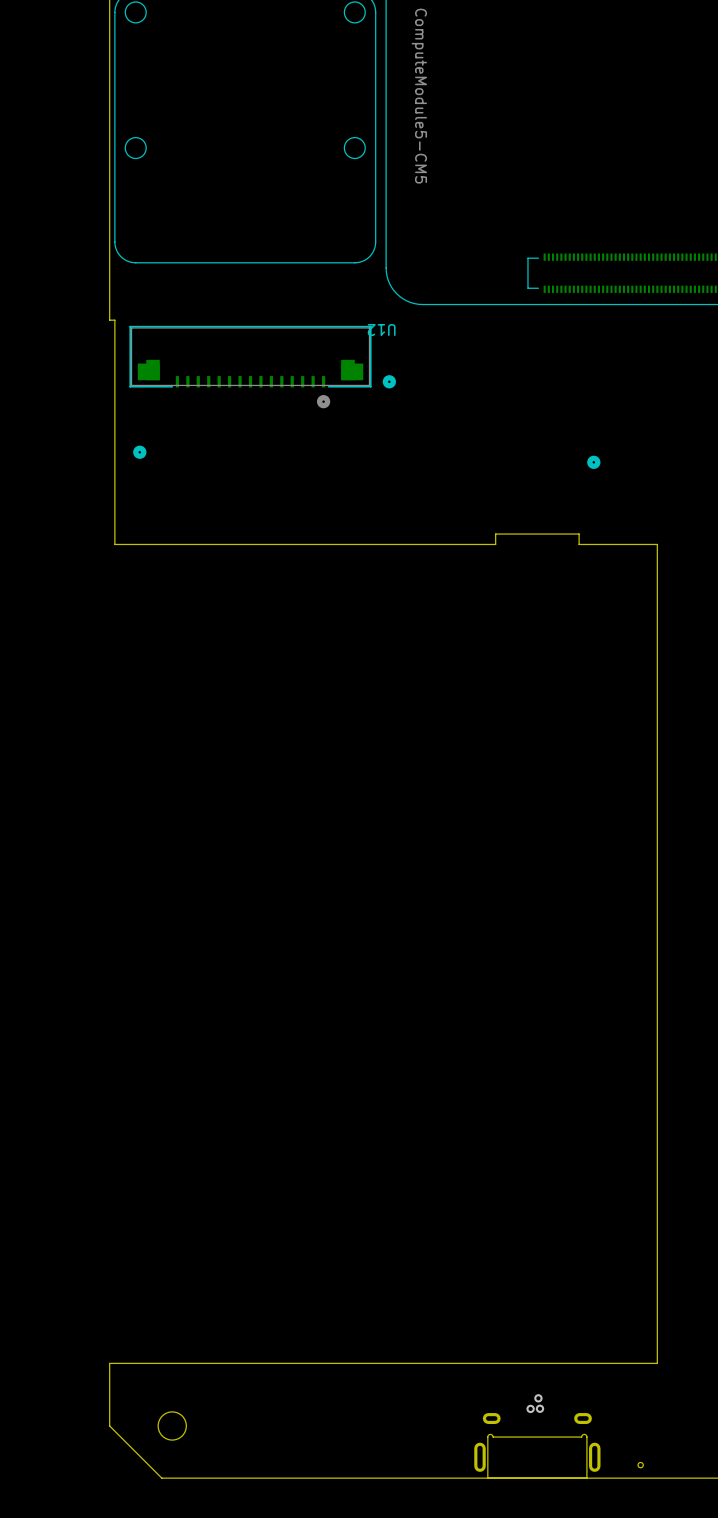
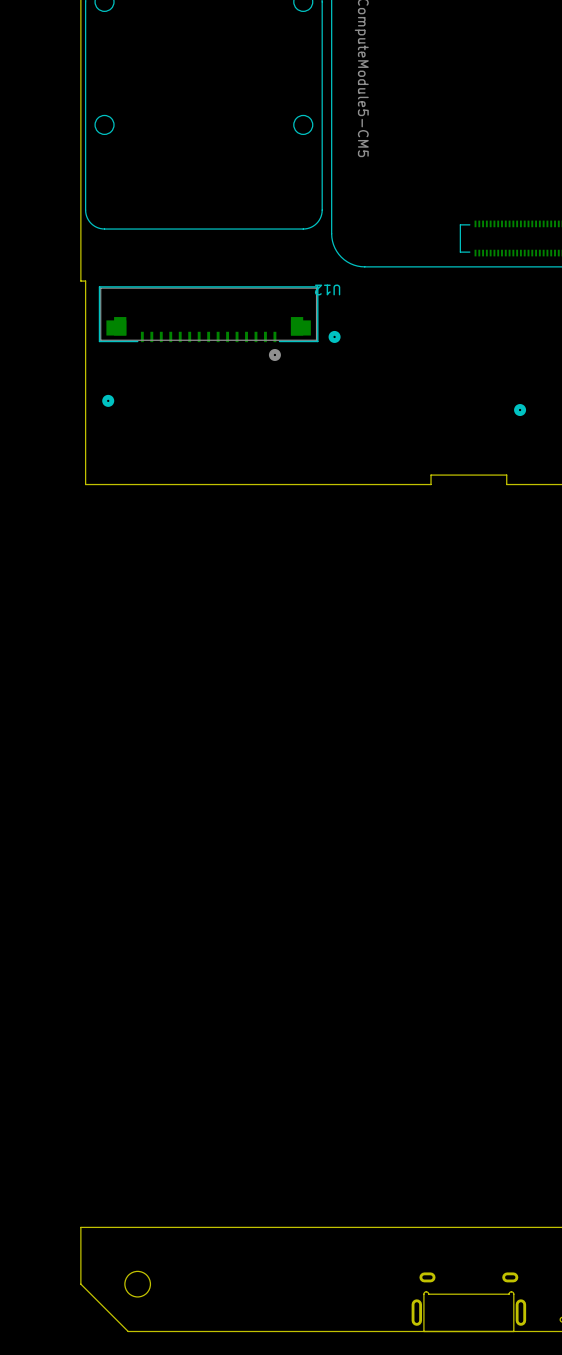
via: (538, 1398) -> none
via: (530, 1408) -> none
via: (539, 1408) -> none

